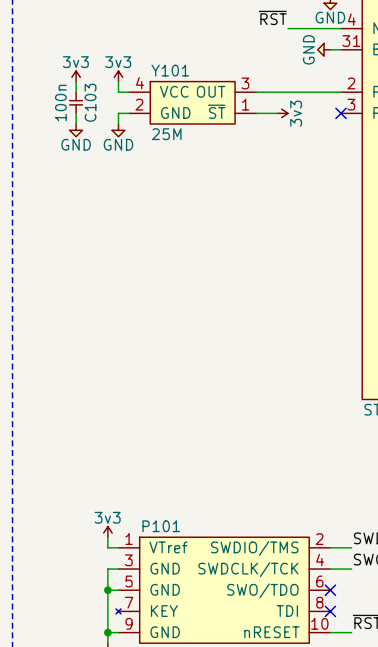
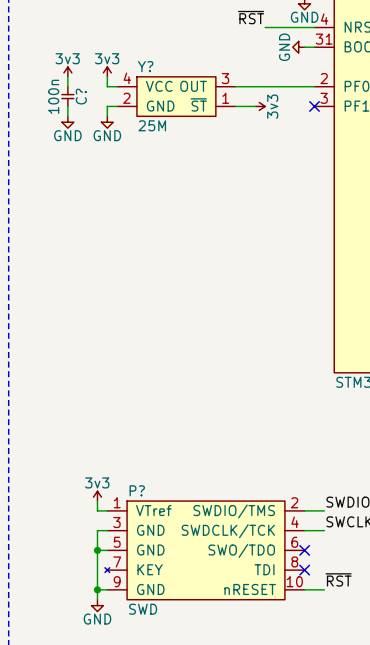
Y101 name: Y101 (170, 70) -> Y? (145, 66)
C103 name: C103 (90, 102) -> C? (81, 96)
P101 name: P101 (161, 526) -> P? (137, 490)

